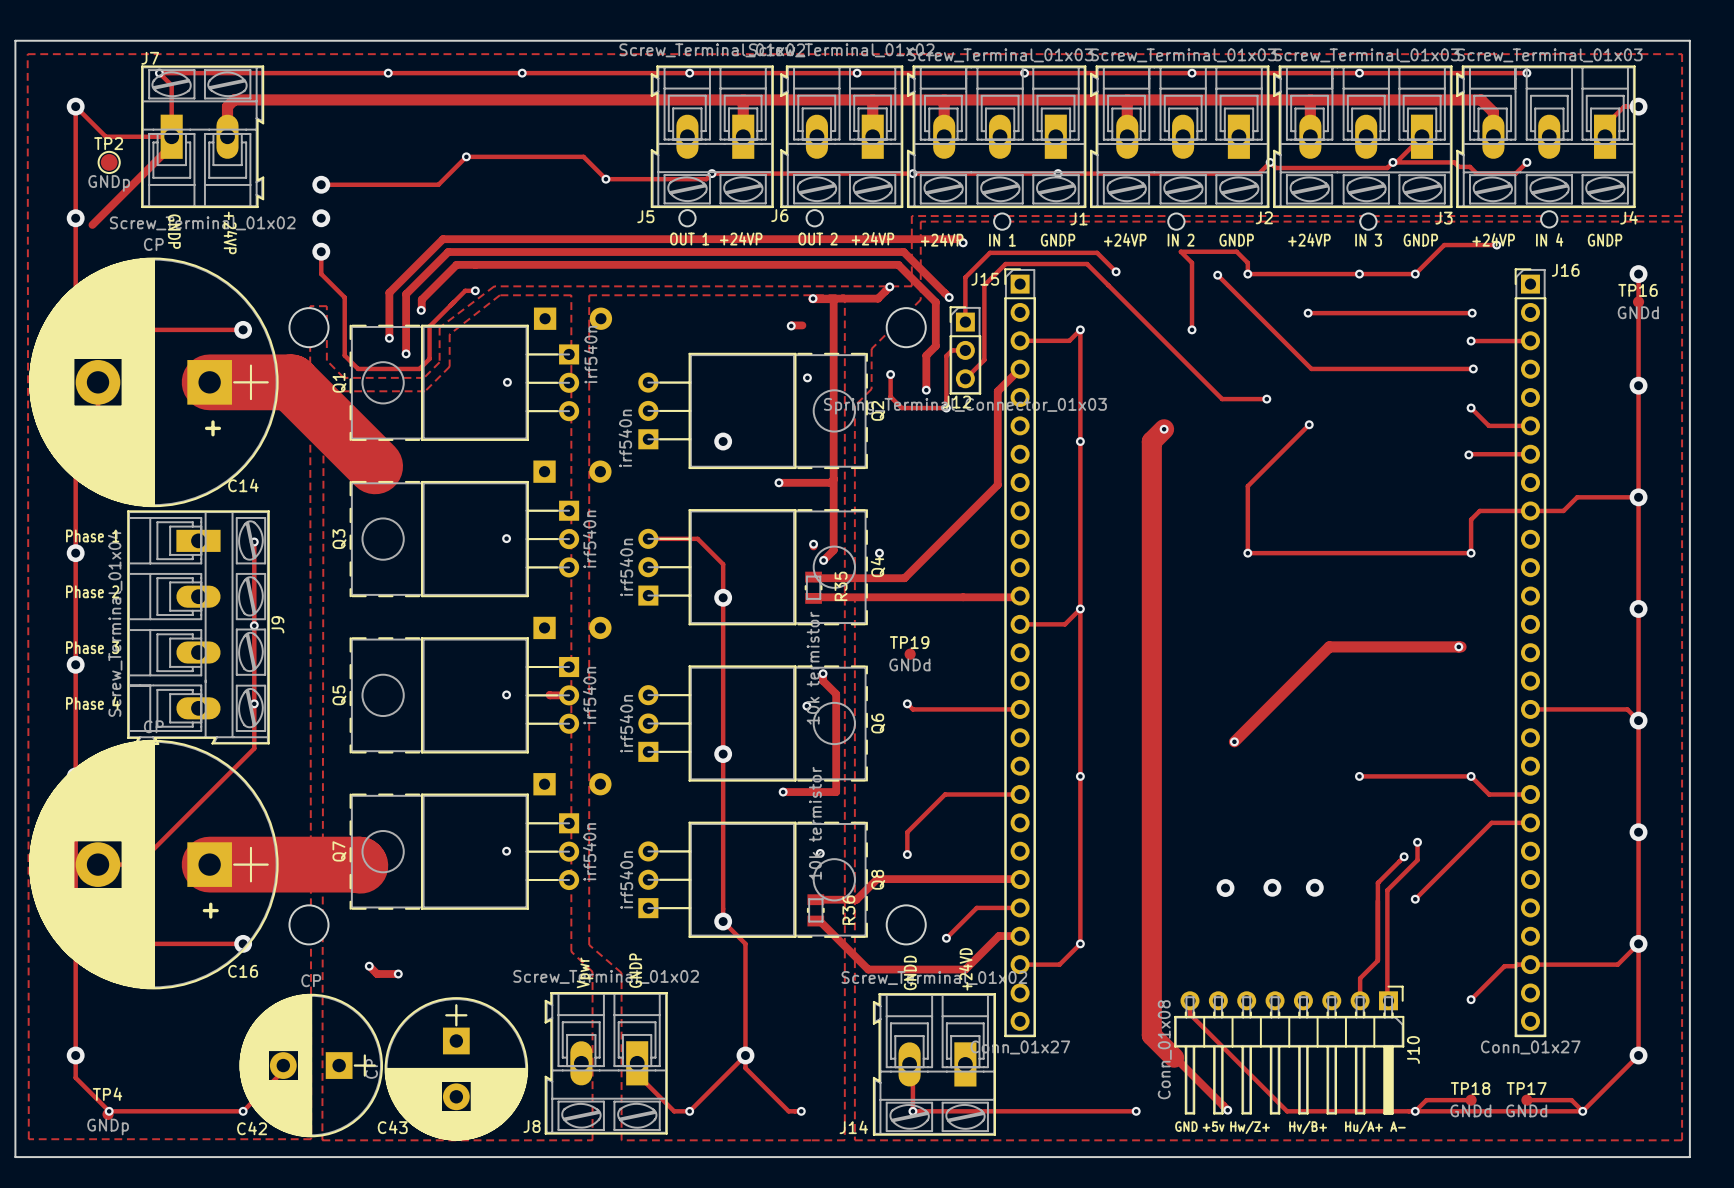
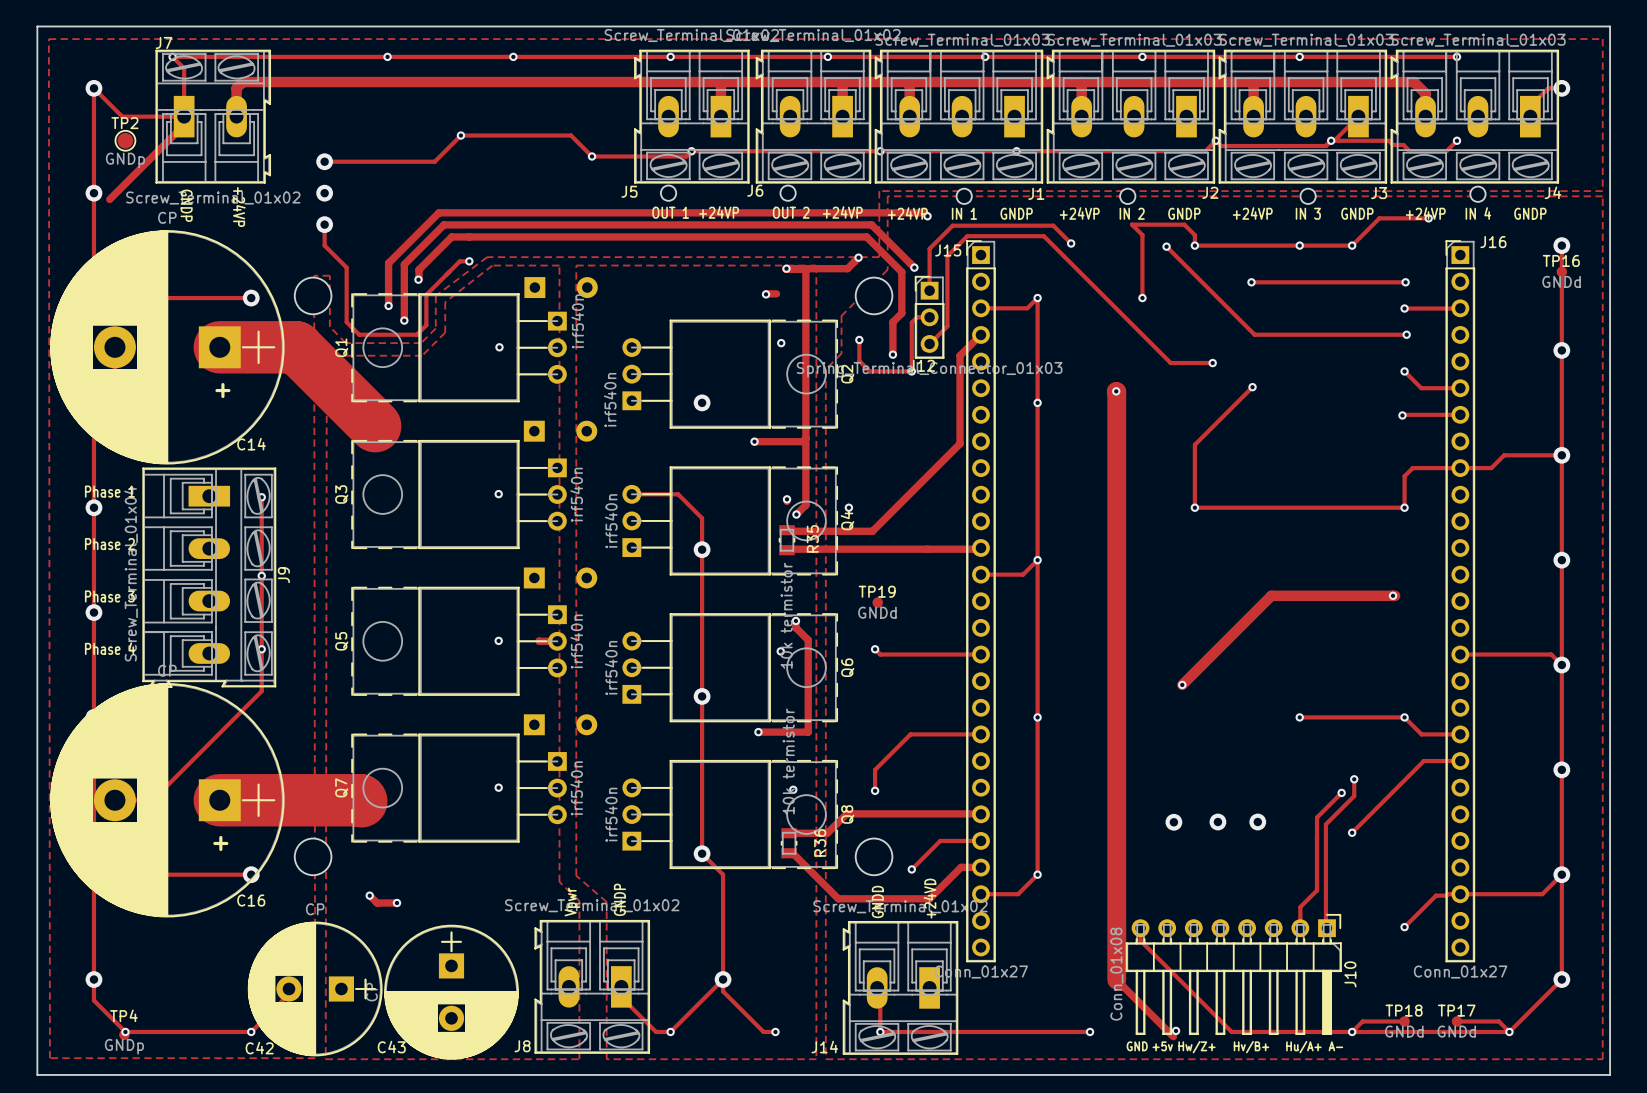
track: (1164, 429) (1151, 441) (1151, 1035) (1174, 1057) -> (1116, 391) (1116, 980) (1173, 1036)
track: (1164, 1056) (1173, 1056) (1227, 1110) -> none

